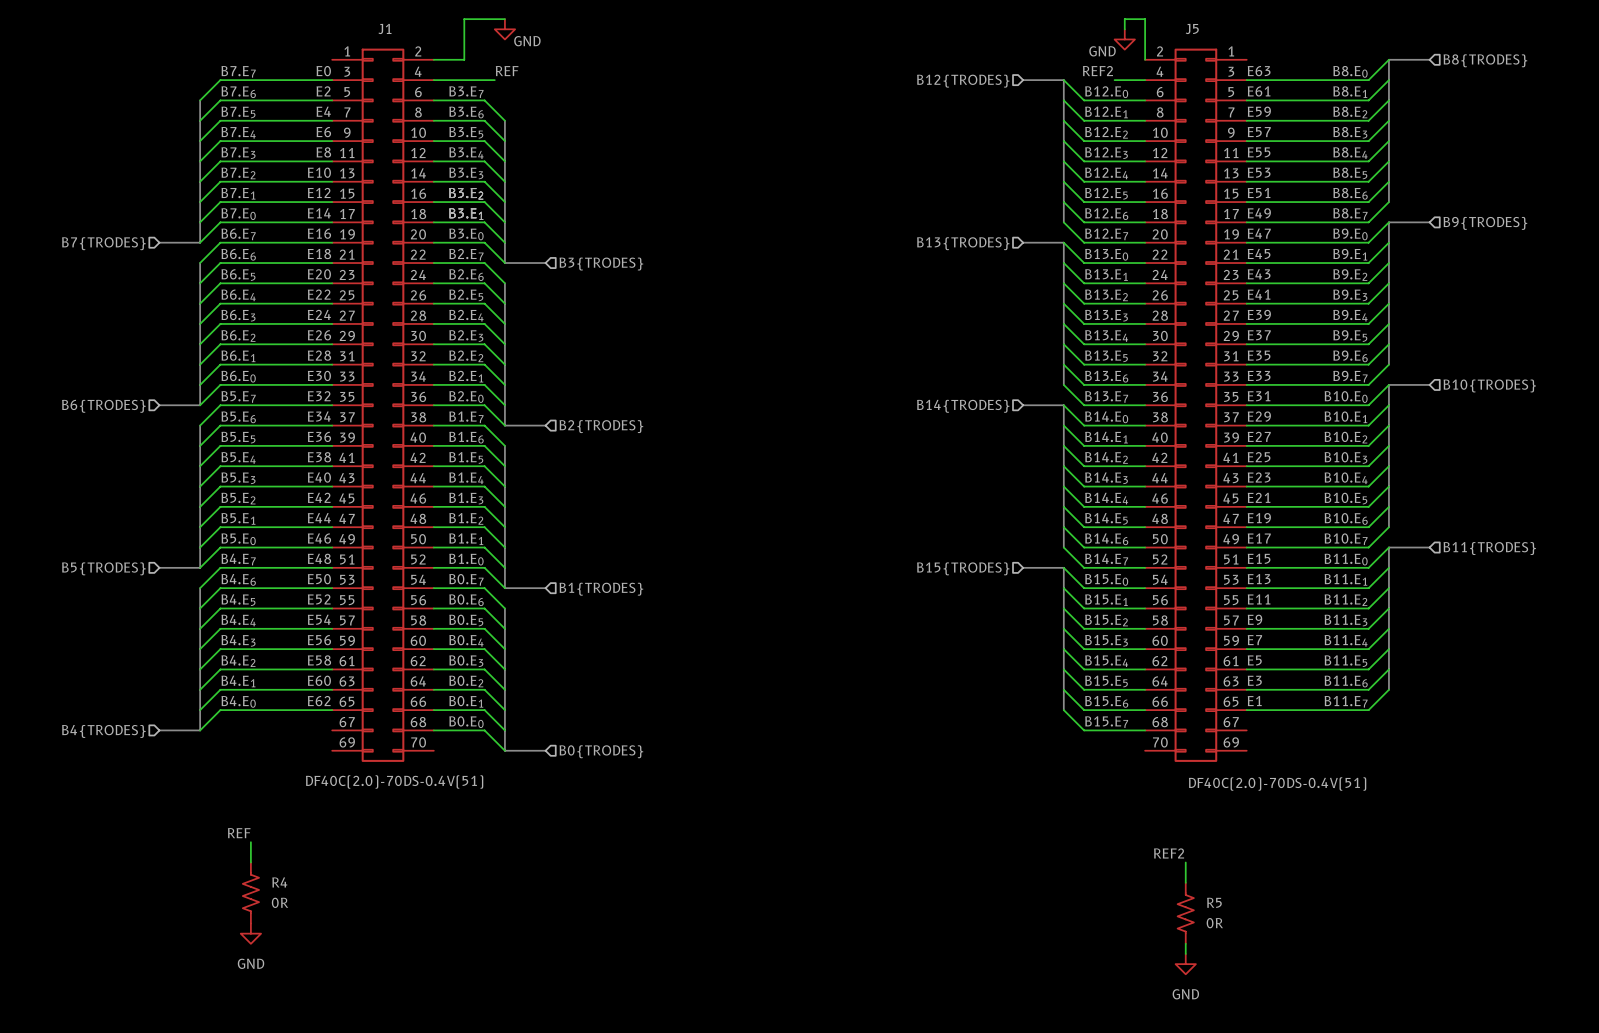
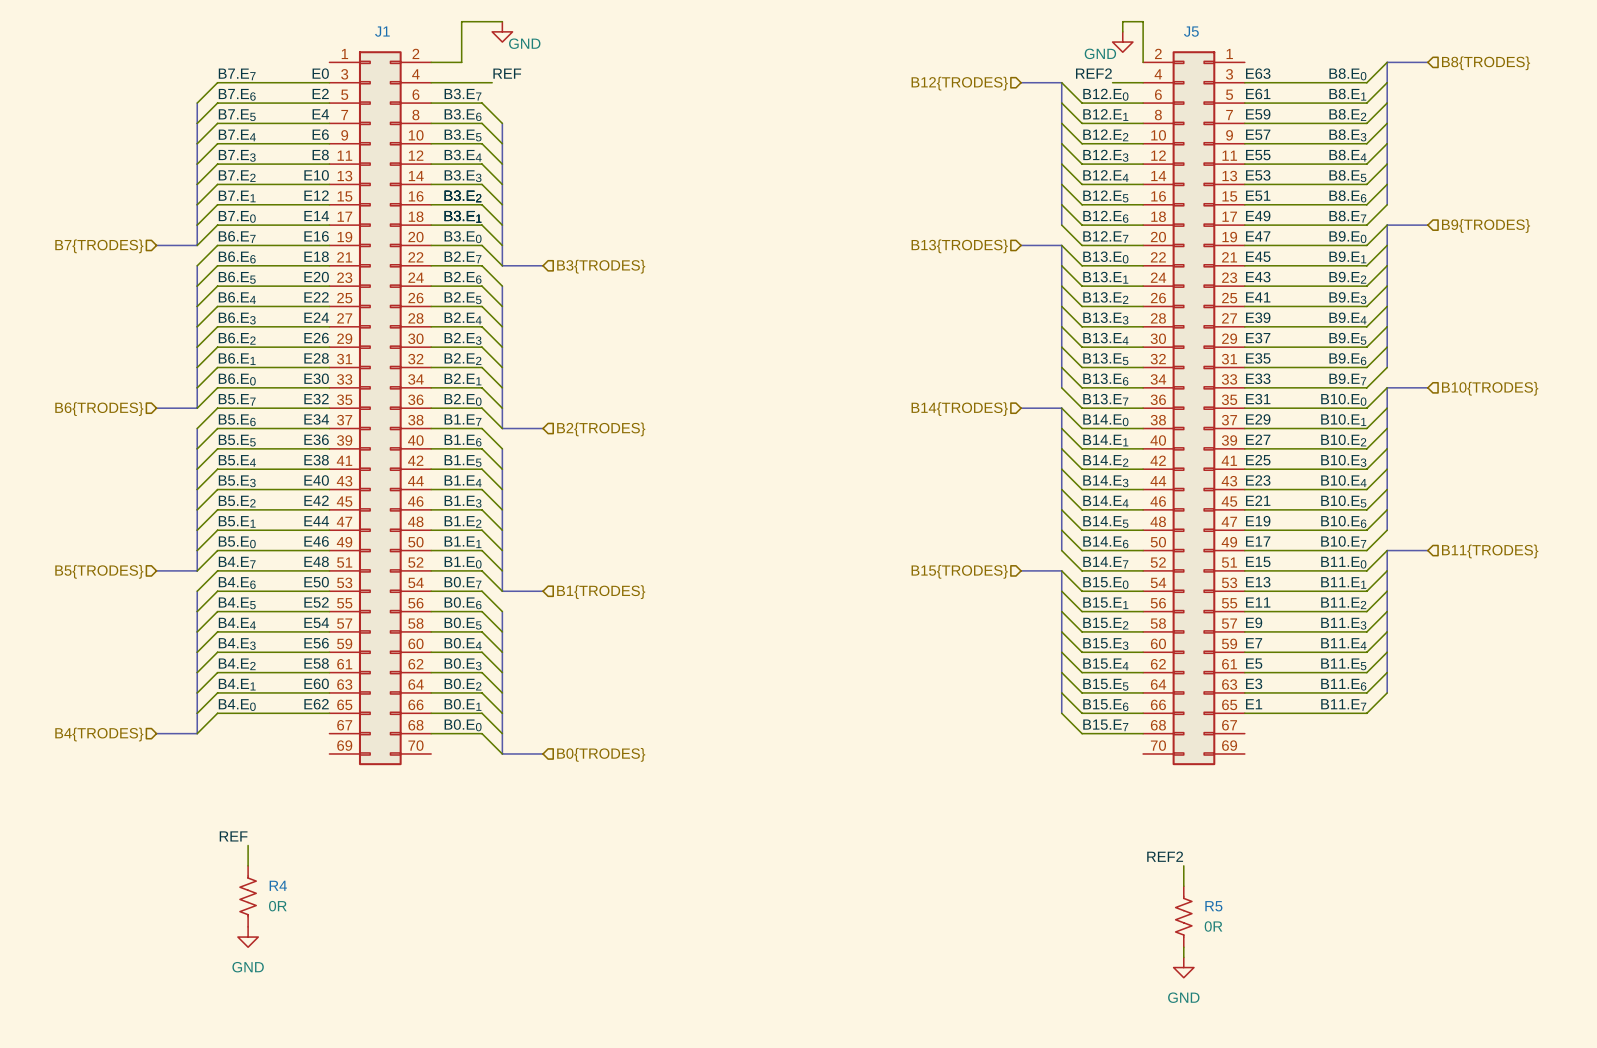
J1 value: DF40C(2.0)-70DS-0.4V(51) (394, 781) -> none
J5 value: DF40C(2.0)-70DS-0.4V(51) (1277, 784) -> none

